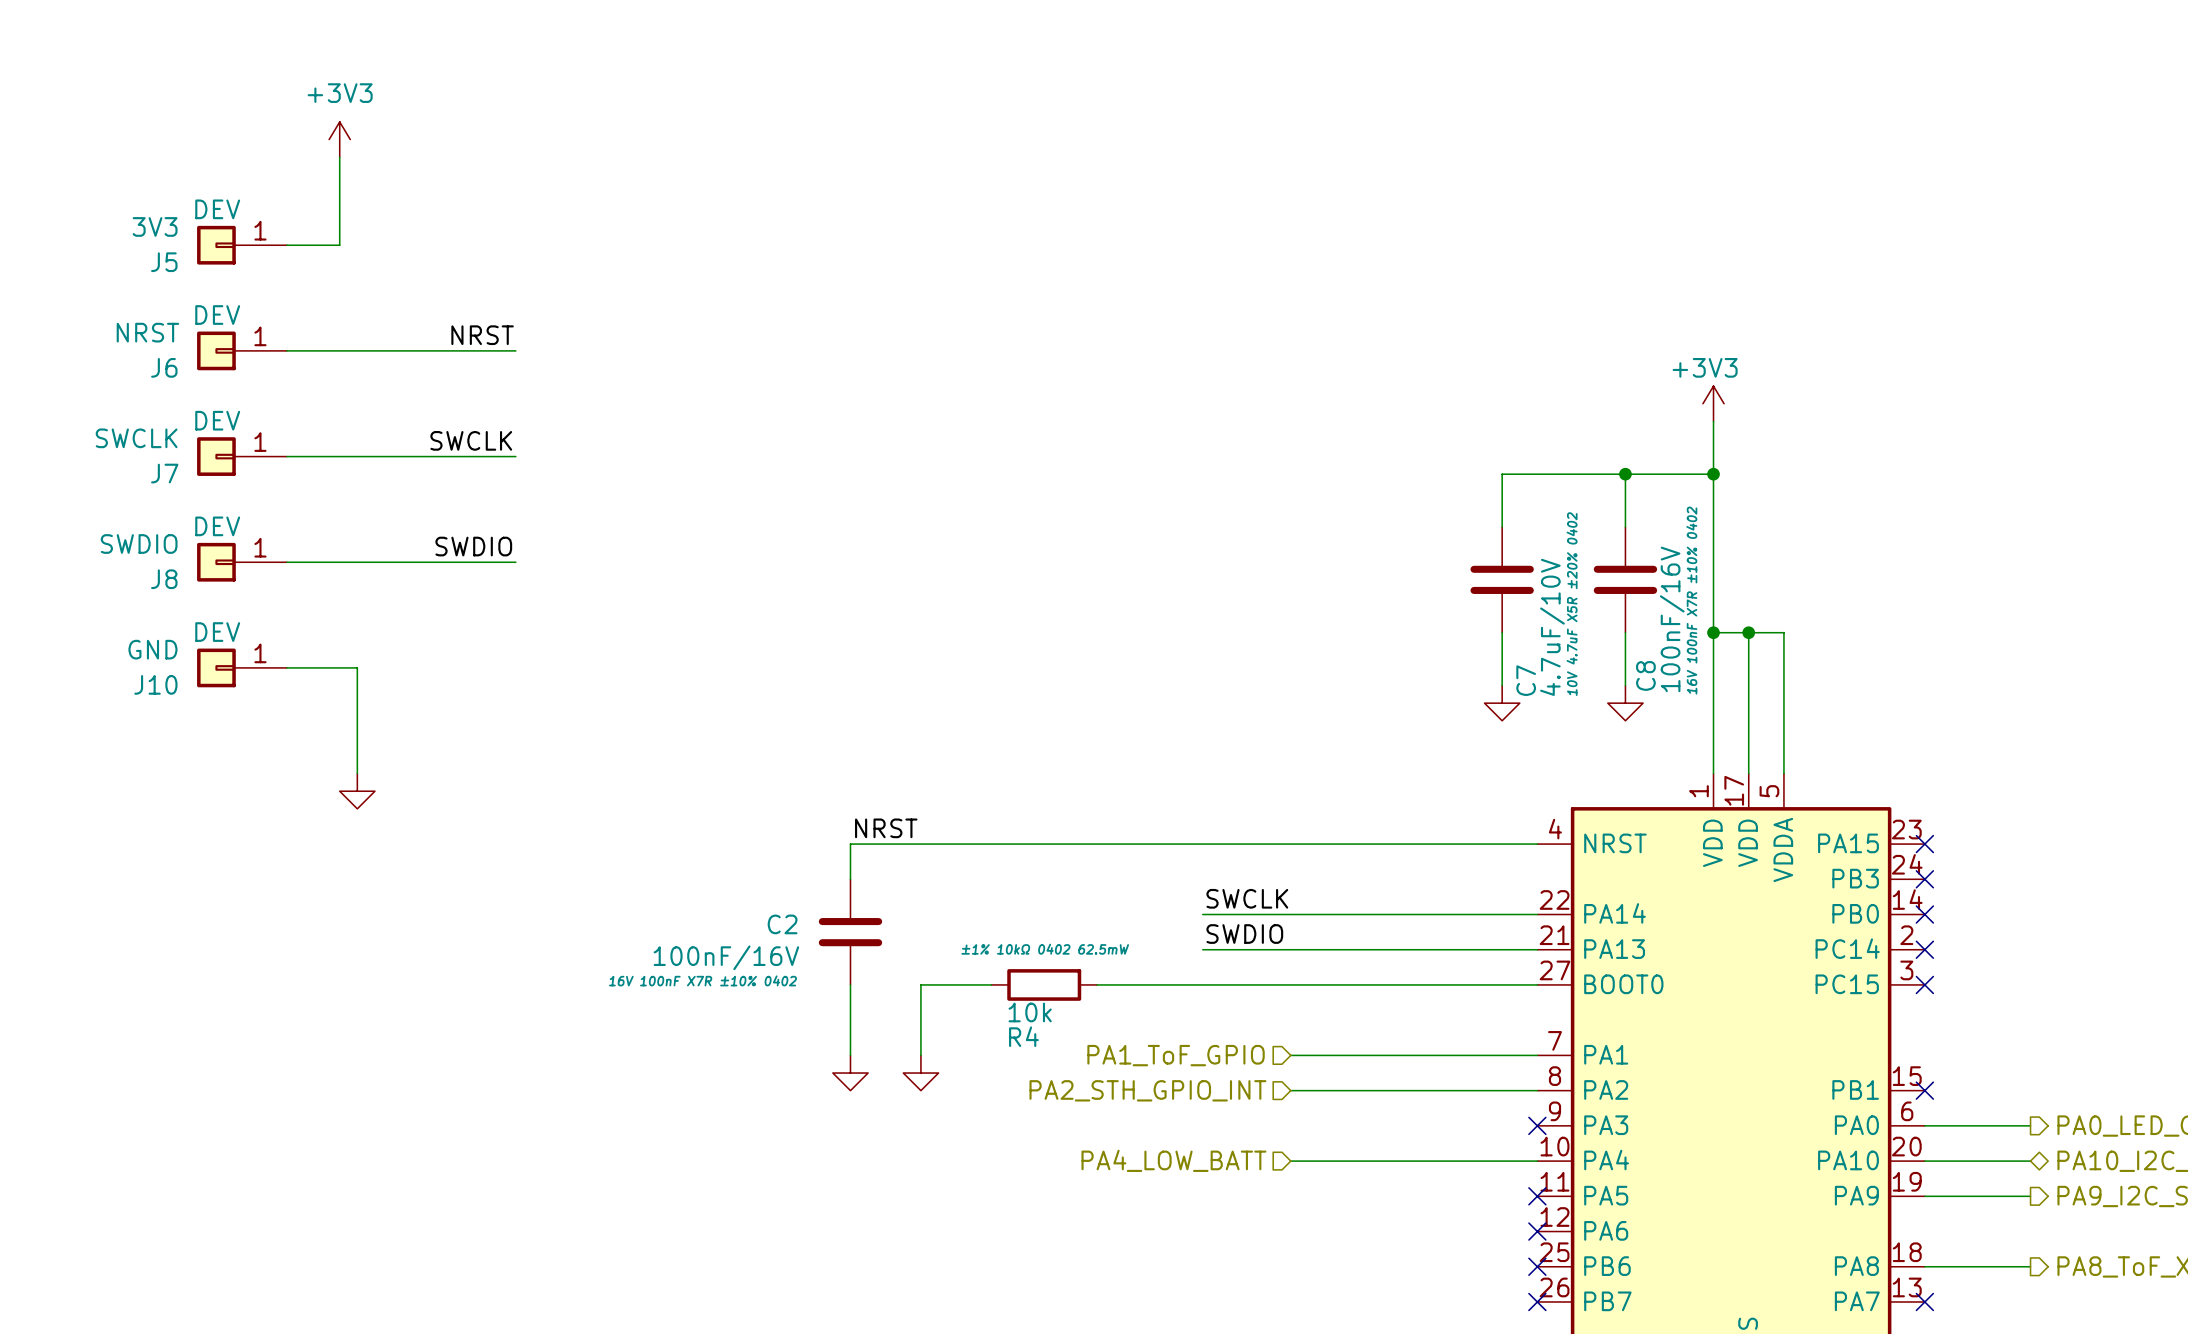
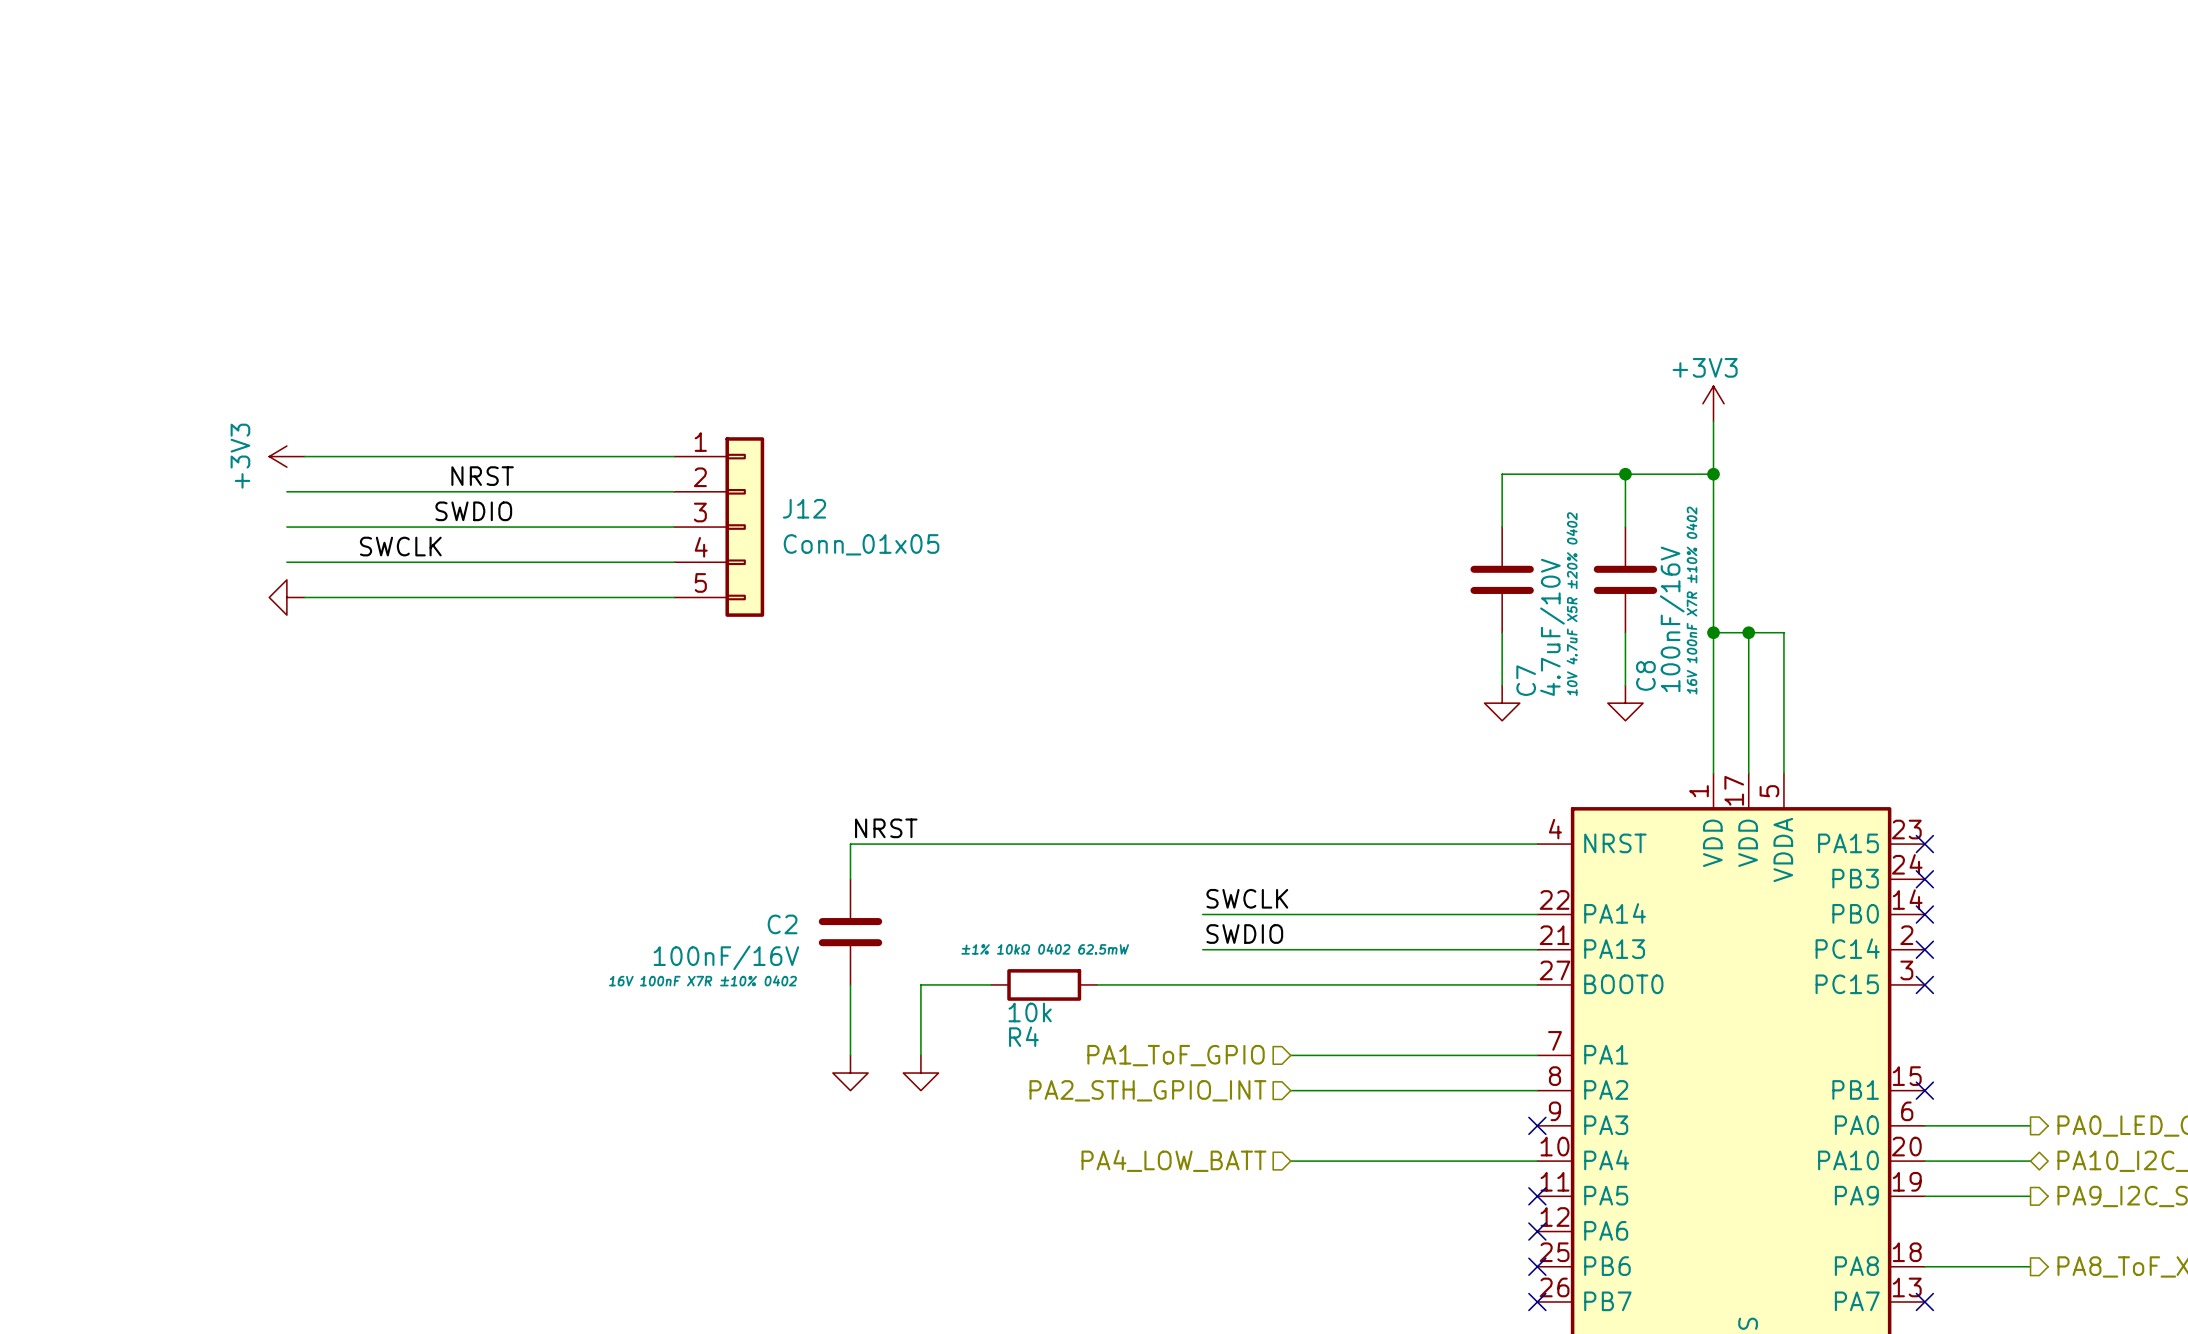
power symbol rotation: 0° (339, 139) -> 90° counterclockwise (286, 456)
power symbol position: +3V3 (339, 139) -> +3V3 (286, 456)
wire: (339, 157) (339, 245) (286, 245) -> none
J5: 3V3 (241, 245) -> none
label position: NRST (482, 335) -> NRST (482, 476)
J6: NRST (241, 350) -> none
wire: (286, 350) (515, 350) -> none
label position: SWCLK (471, 440) -> SWCLK (400, 546)
J7: SWCLK (241, 456) -> none
wire: none -> (515, 456) (674, 456)
wire: none -> (286, 491) (674, 491)
wire: none -> (286, 527) (674, 527)
J12: none -> Conn_01x05 (719, 527)
label position: SWDIO (473, 546) -> SWDIO (473, 511)
J8: SWDIO (241, 562) -> none
wire: none -> (515, 562) (674, 562)
wire: none -> (304, 597) (674, 597)
J10: GND (241, 667) -> none
wire: (286, 667) (357, 667) (357, 773) -> none
power symbol rotation: 0° (357, 791) -> 90° clockwise (286, 597)
power symbol position: (357, 791) -> (286, 597)

